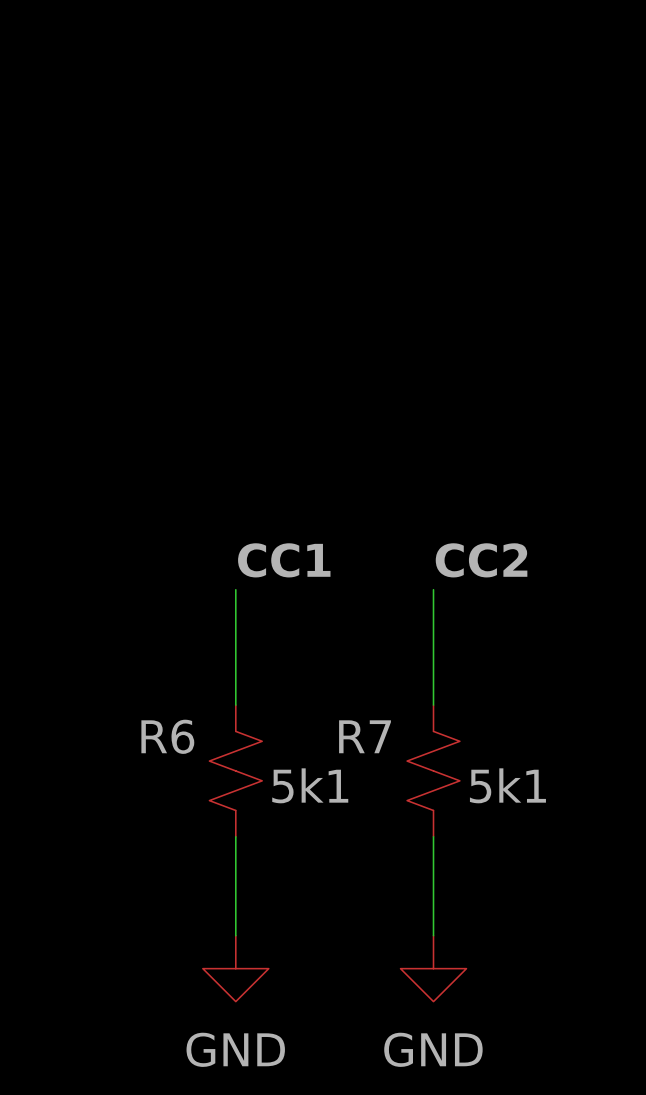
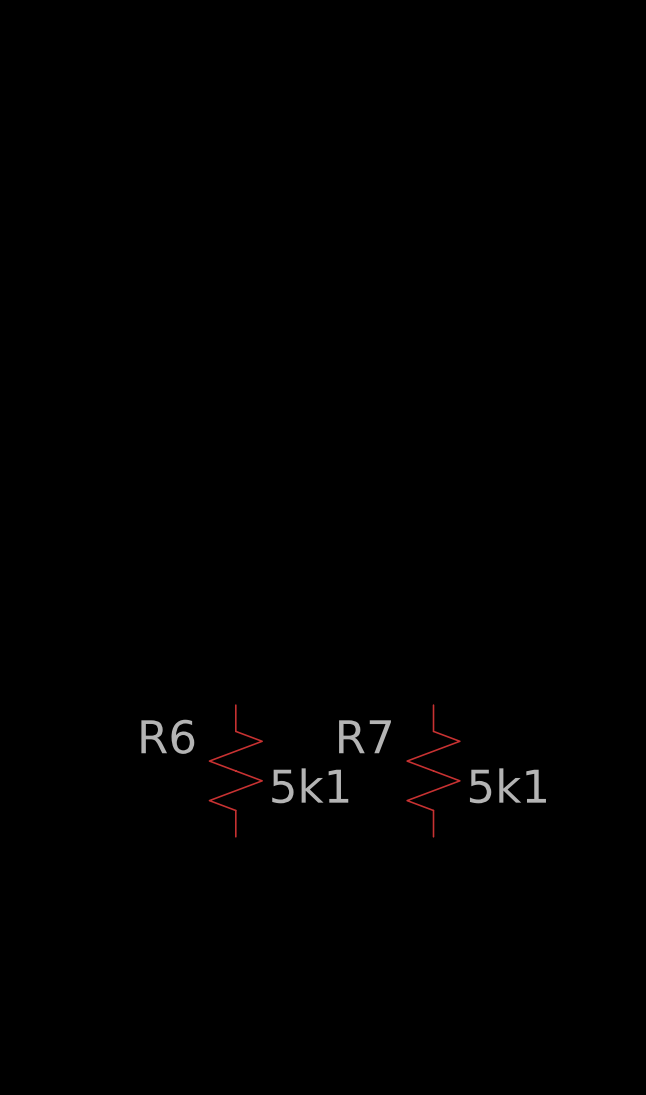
label: CC1 (284, 560) -> none
label: CC2 (481, 560) -> none
wire: (235, 589) (235, 705) -> none
wire: (433, 589) (433, 705) -> none
wire: (235, 836) (235, 935) -> none
wire: (433, 836) (433, 935) -> none
power symbol: GND (235, 968) -> none
power symbol: GND (433, 968) -> none

